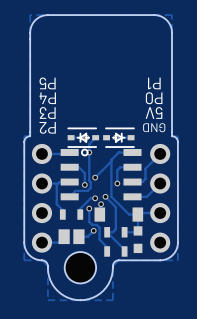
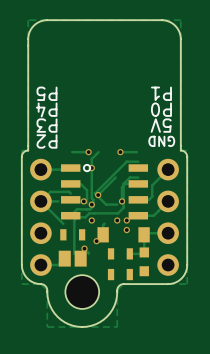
part: (83, 137) -> none
part: (118, 137) -> none
track: none -> (138, 161) (126, 161) (94, 193) (106, 204) (117, 204)
track: (132, 152) (118, 152) (111, 159) (111, 196) (129, 214) (137, 214) -> none
track: none -> (138, 177) (129, 177) (123, 183) (123, 207) (118, 213) (89, 213) (85, 217) (77, 217) (74, 220) (74, 253)
track: none -> (70, 193) (50, 191) (40, 201) (63, 223)
track: (69, 182) (59, 182) (56, 184) (56, 204) (62, 210) (62, 214) -> none
via: none -> (83, 201)
via: (84, 184) -> none
via: none -> (91, 204)
track: (105, 196) (115, 207) (115, 229) (112, 232) (107, 232) (124, 251) -> none
via: (105, 196) -> none
track: (95, 198) (90, 198) (80, 208) (80, 214) -> none
via: (95, 198) -> none
via: none -> (91, 220)
via: none -> (117, 220)
via: none -> (126, 220)
via: (101, 204) -> none
track: (89, 208) (89, 221) (99, 227) (99, 239) (107, 247) (107, 251) -> none
via: (89, 208) -> none
via: none -> (126, 230)
via: none -> (96, 241)
track: none -> (84, 248) (88, 253)
via: none -> (84, 248)
track: (93, 230) (87, 236) (78, 236) -> none
via: (93, 230) -> none

